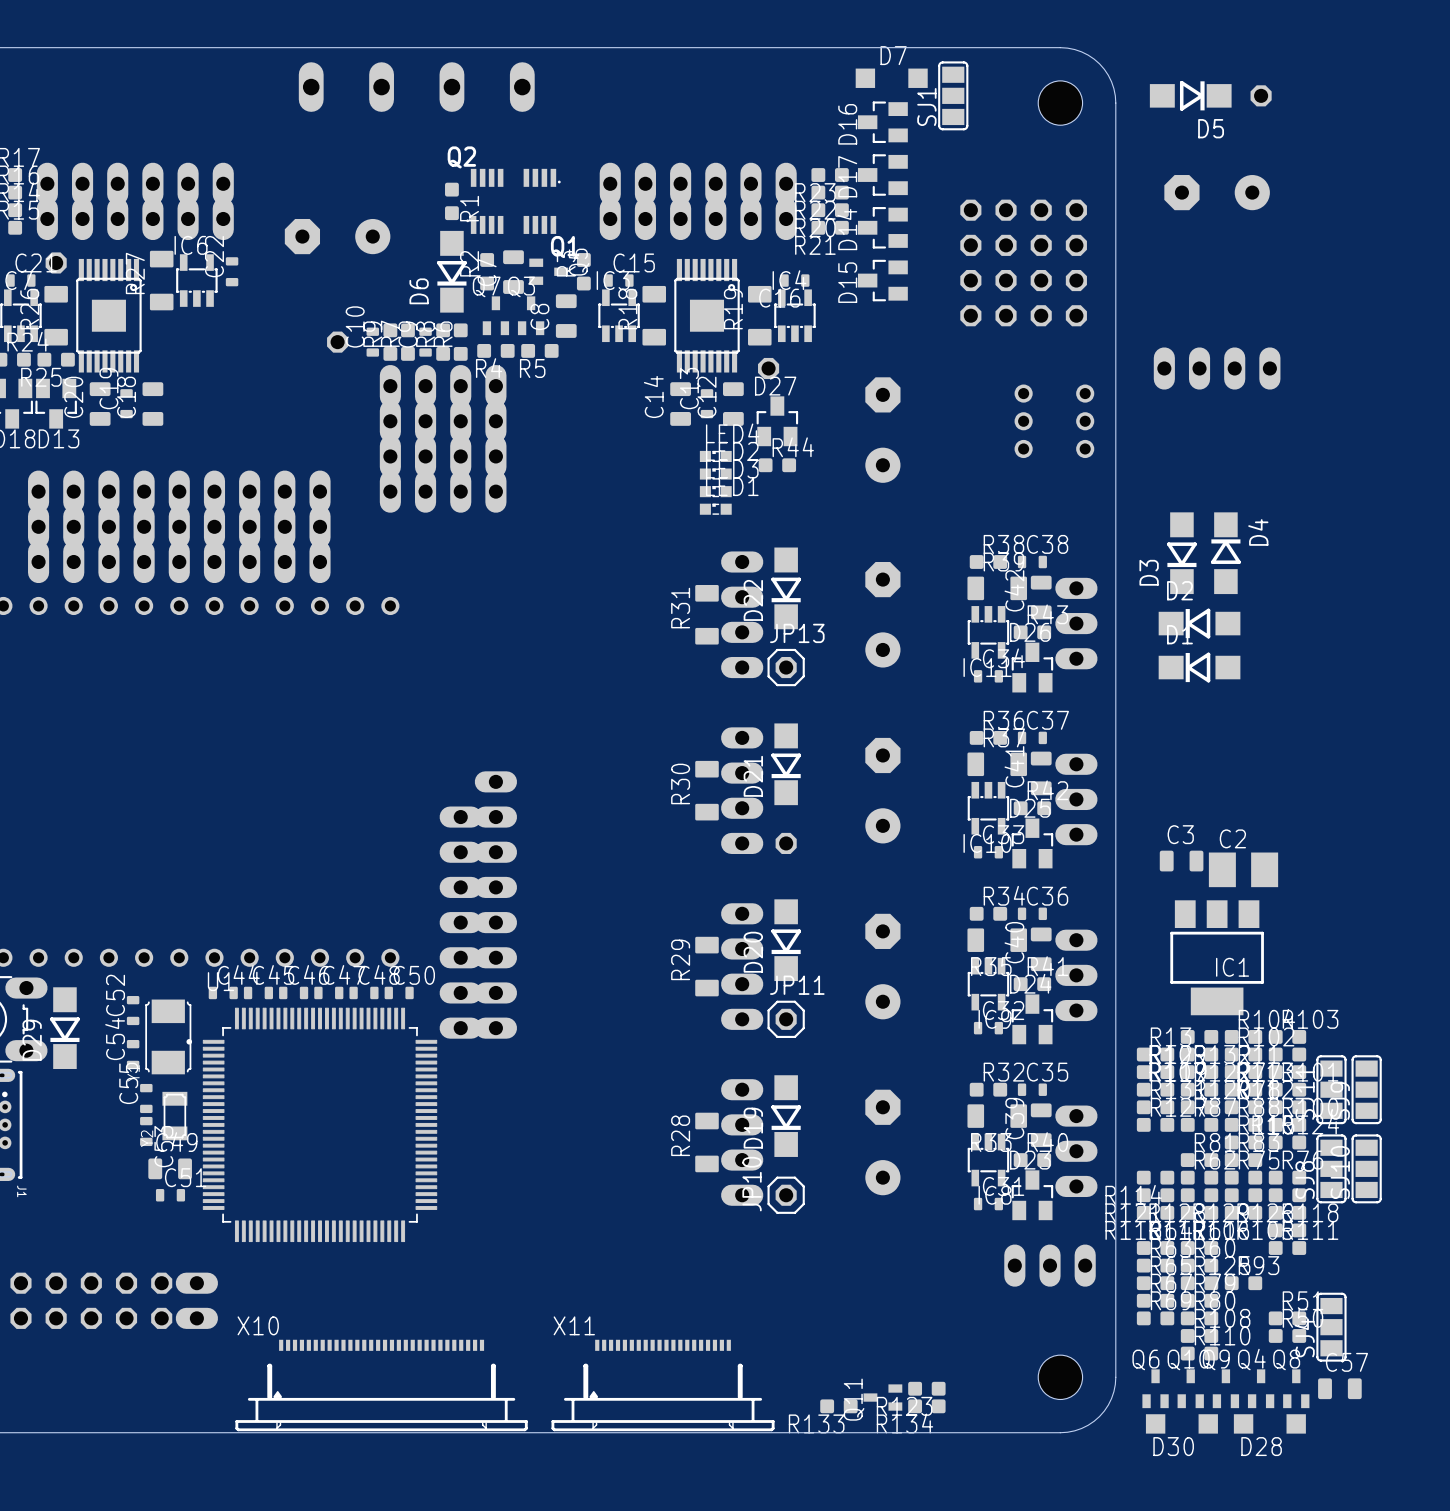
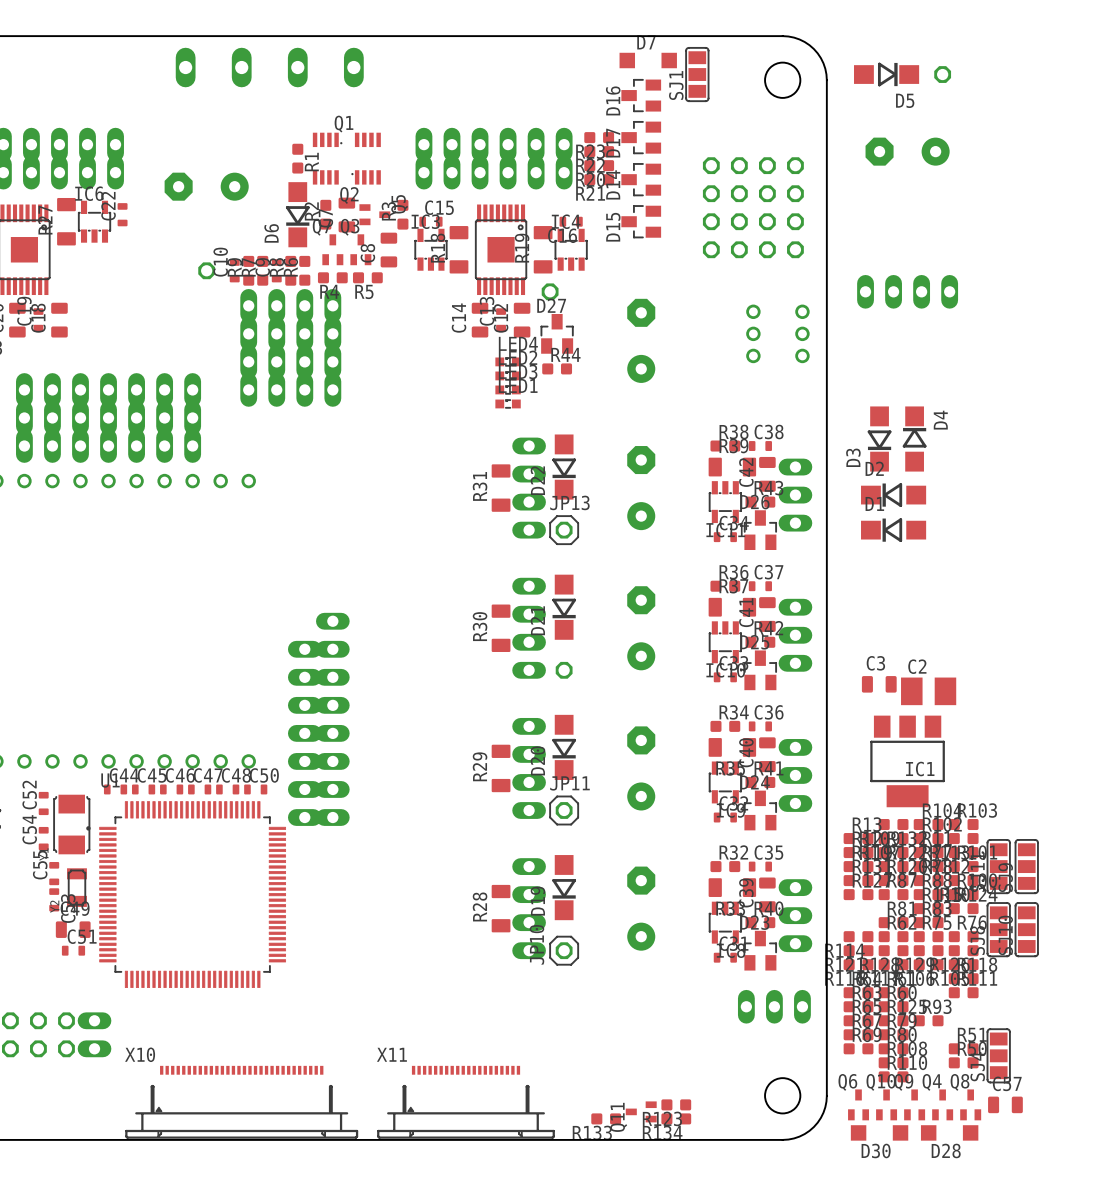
Q2 rotation: 0° (484, 201) -> 180° (327, 158)
Q1 rotation: 0° (542, 201) -> 180° (366, 158)

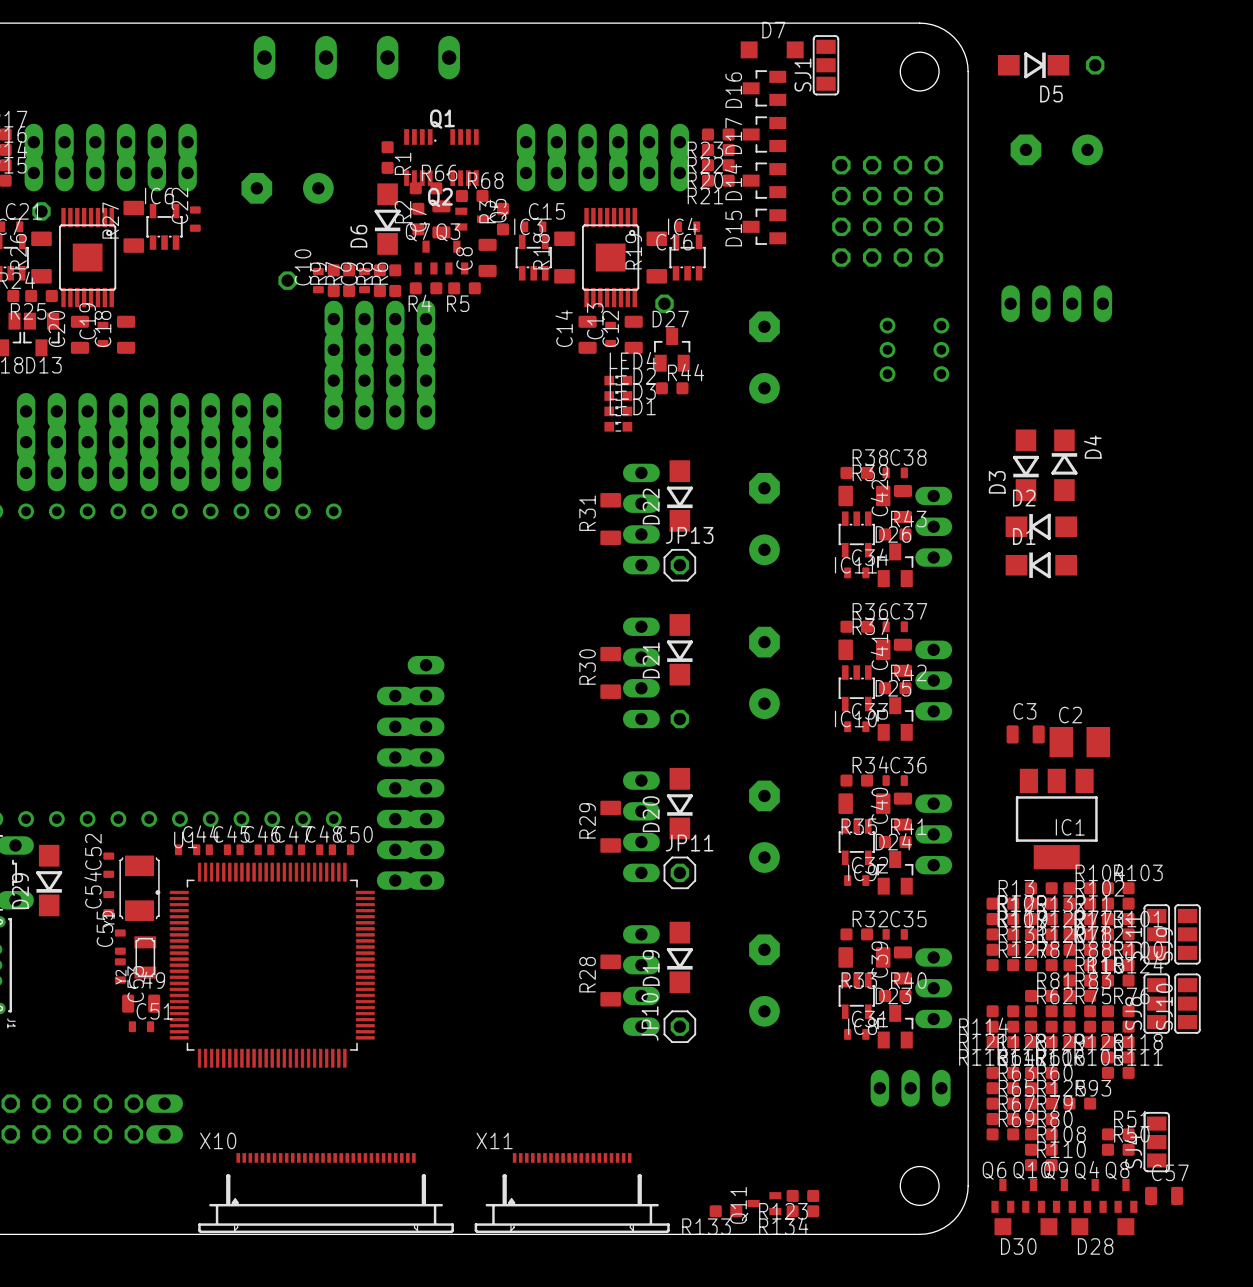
R66: none -> (426, 188)
R68: none -> (472, 196)

